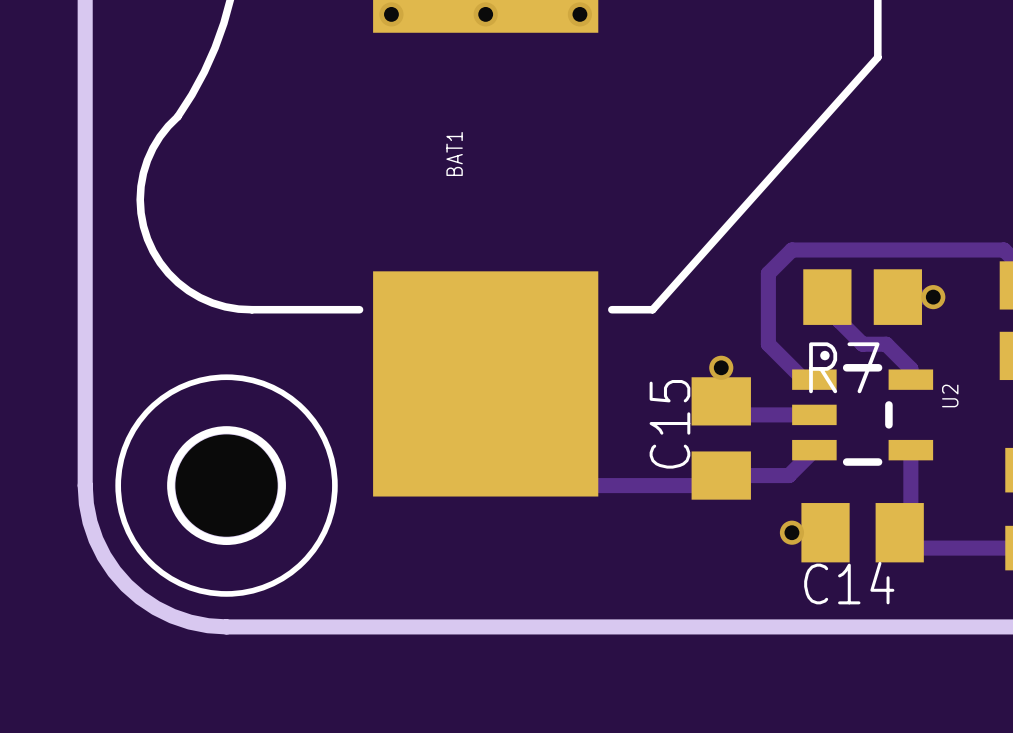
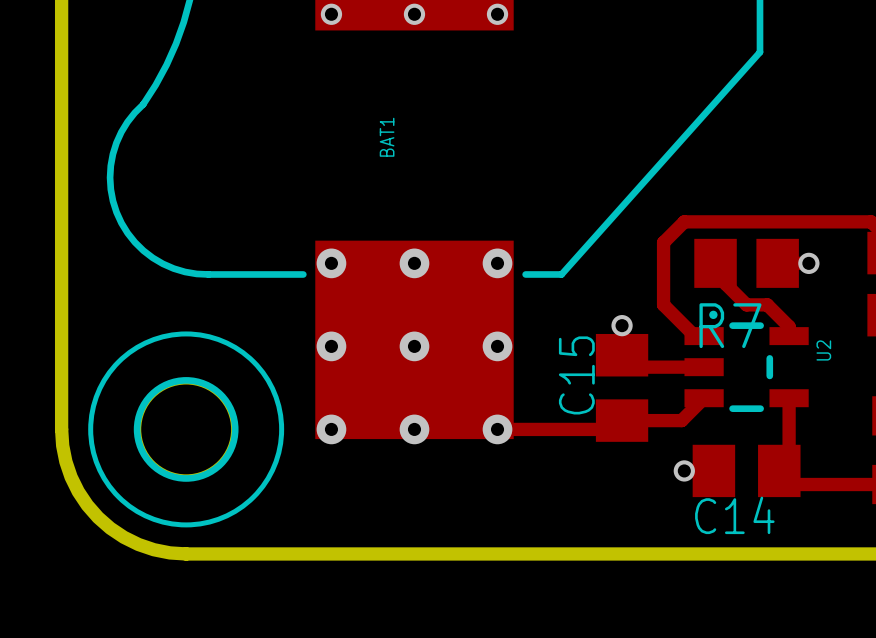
via: none -> (331, 263)
via: none -> (414, 263)
via: none -> (497, 263)
via: none -> (331, 346)
via: none -> (414, 346)
via: none -> (497, 346)
via: none -> (331, 429)
via: none -> (414, 429)
via: none -> (497, 429)

